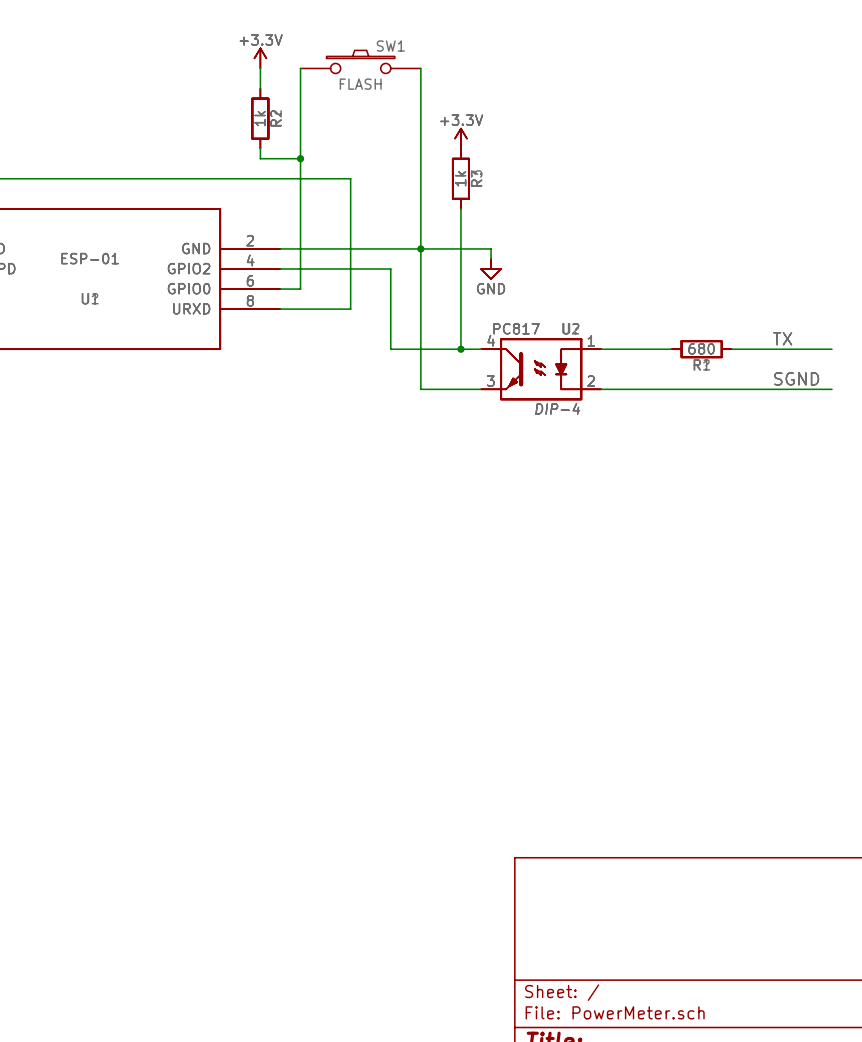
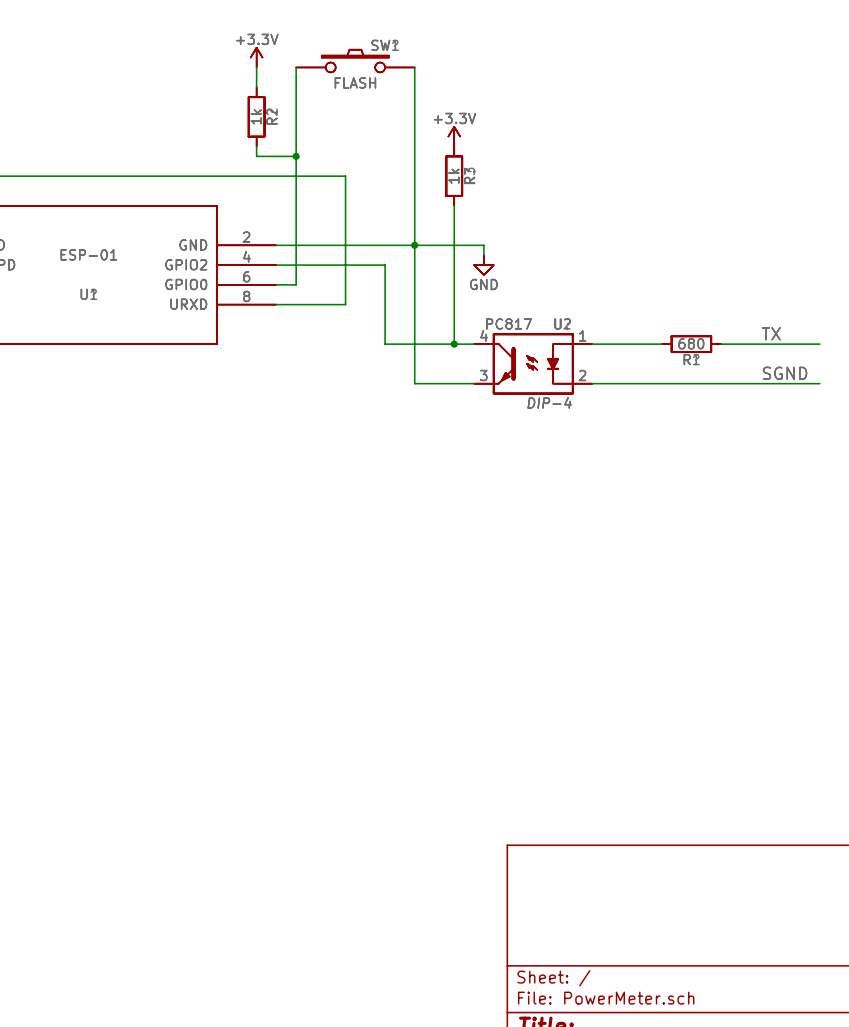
part: none -> FLASH (355, 61)

